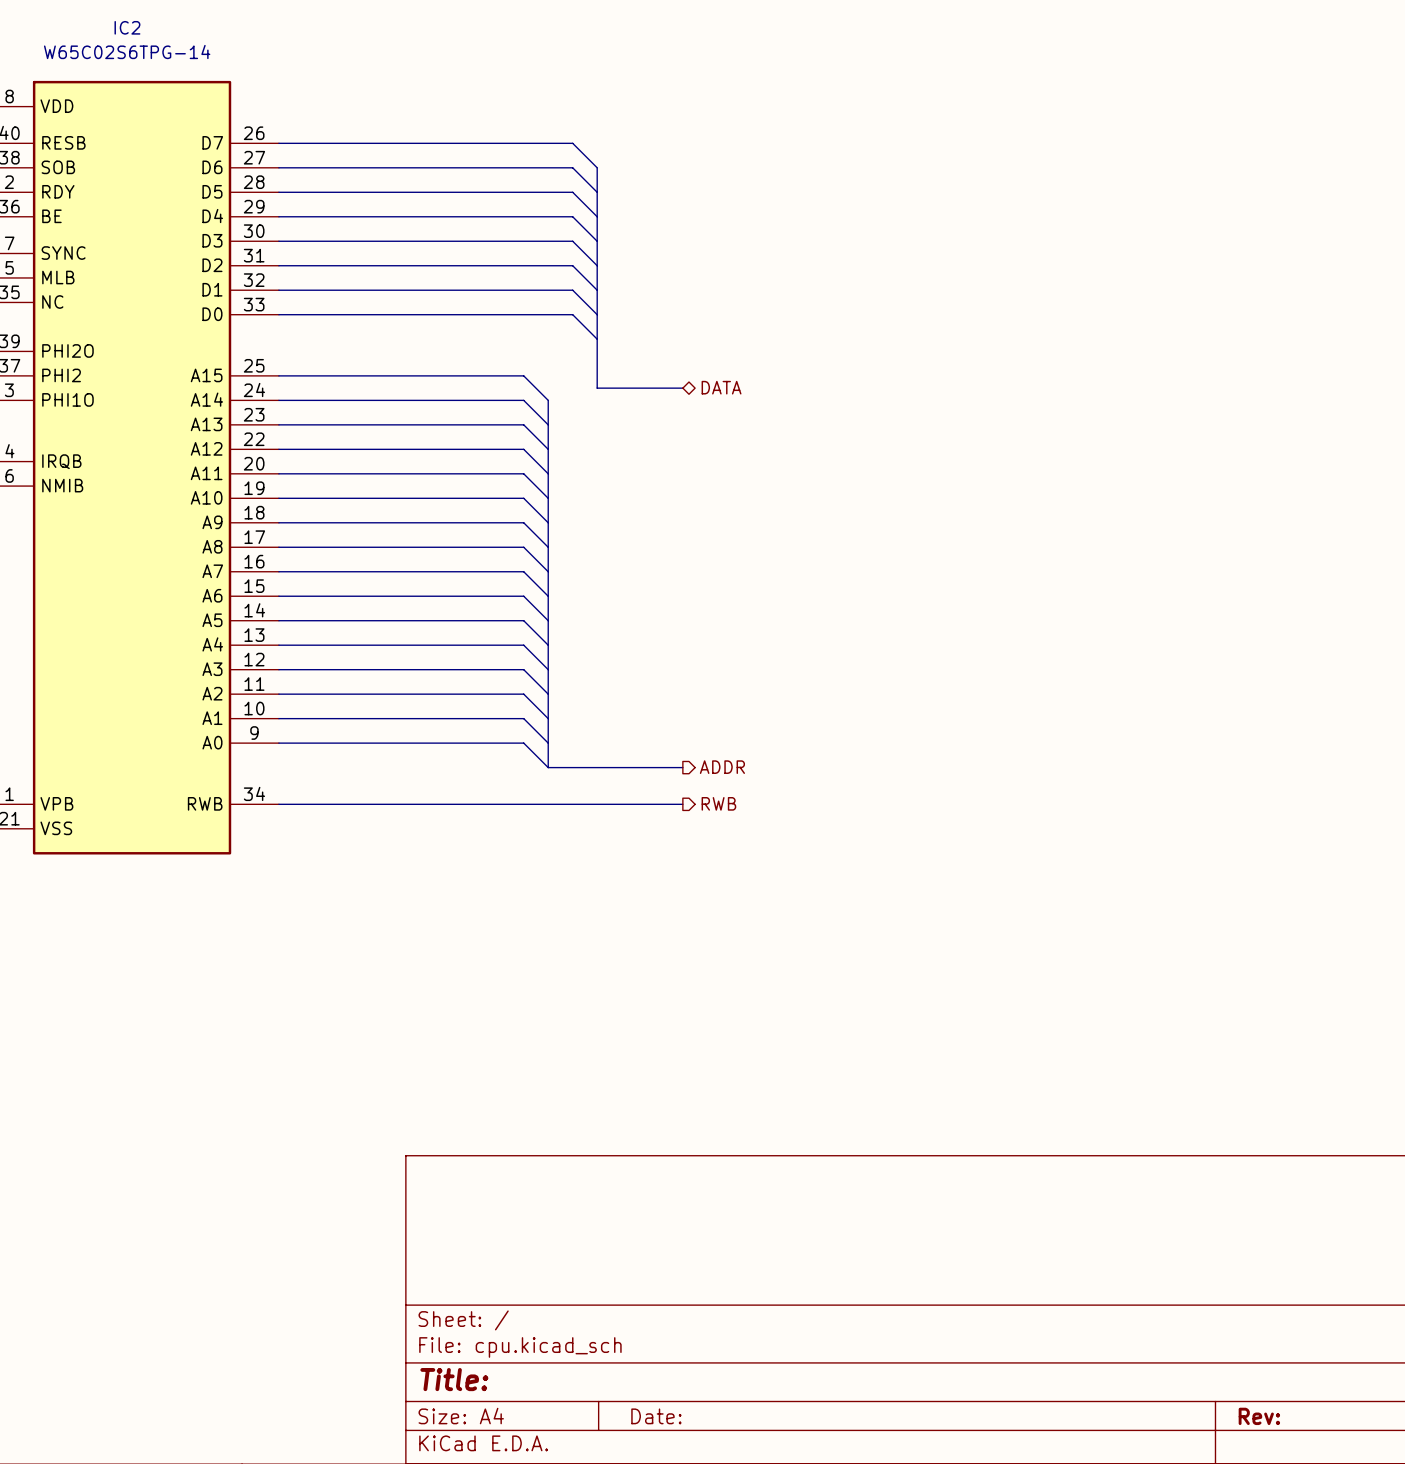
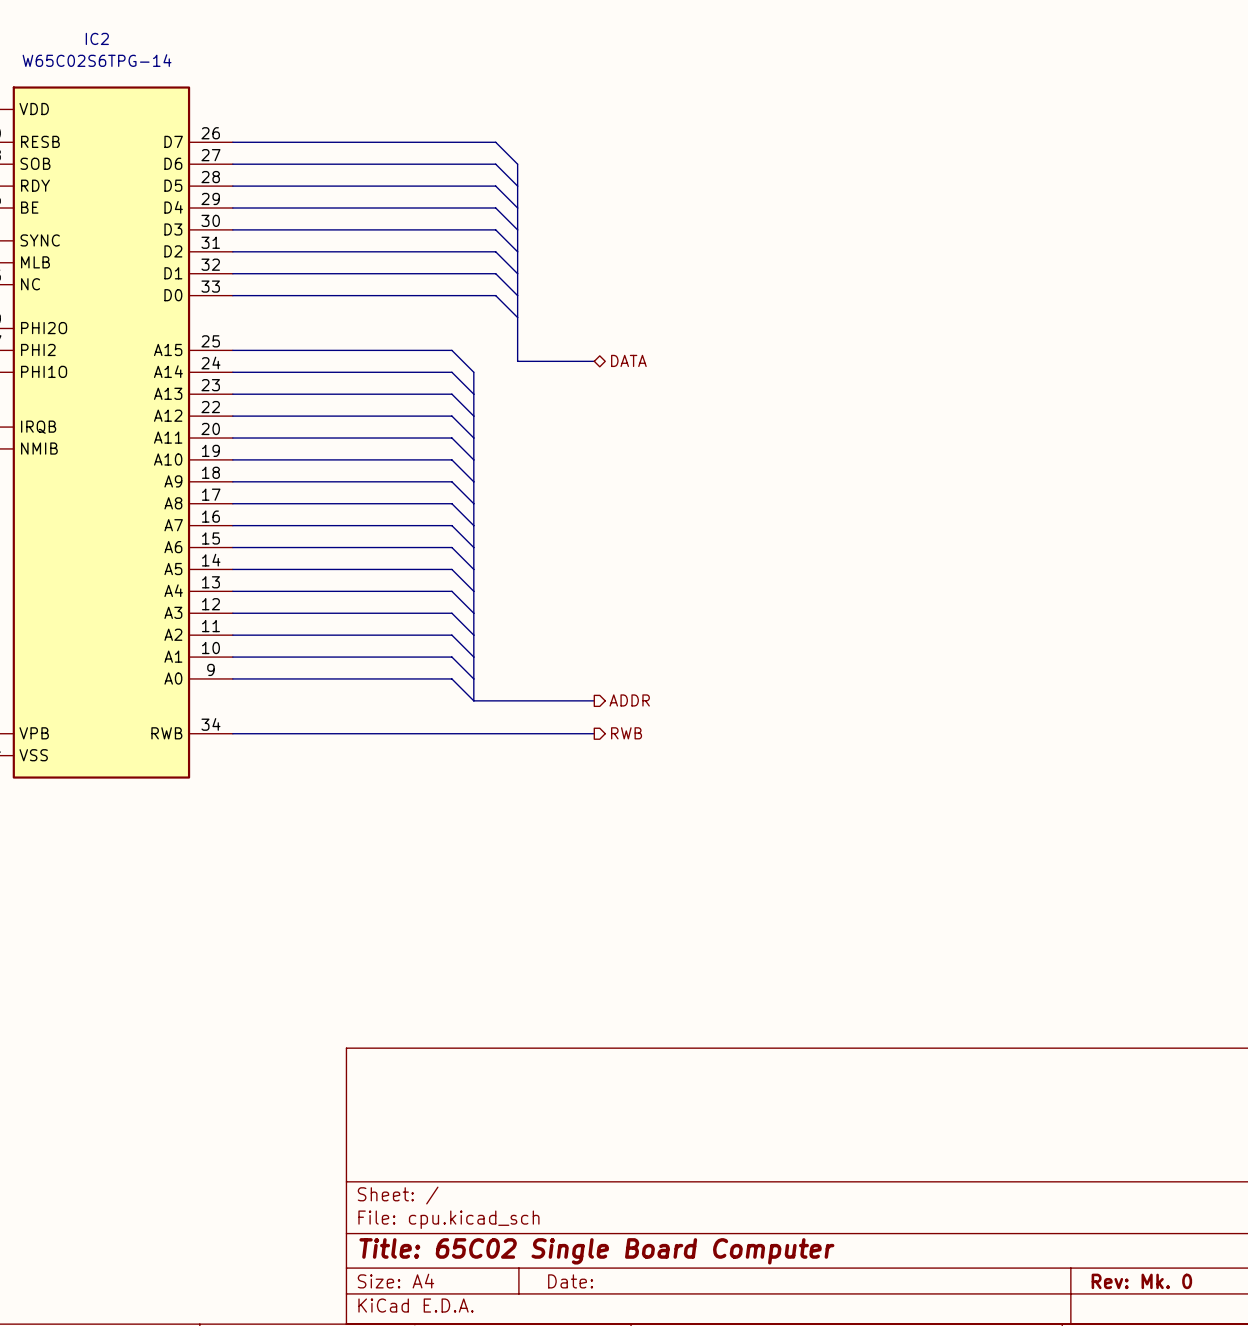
title block: Title: (454, 1379) -> Title: 65C02 Single Board Computer (596, 1251)
title block: Rev: (1259, 1416) -> Rev: Mk. 0 (1141, 1281)

